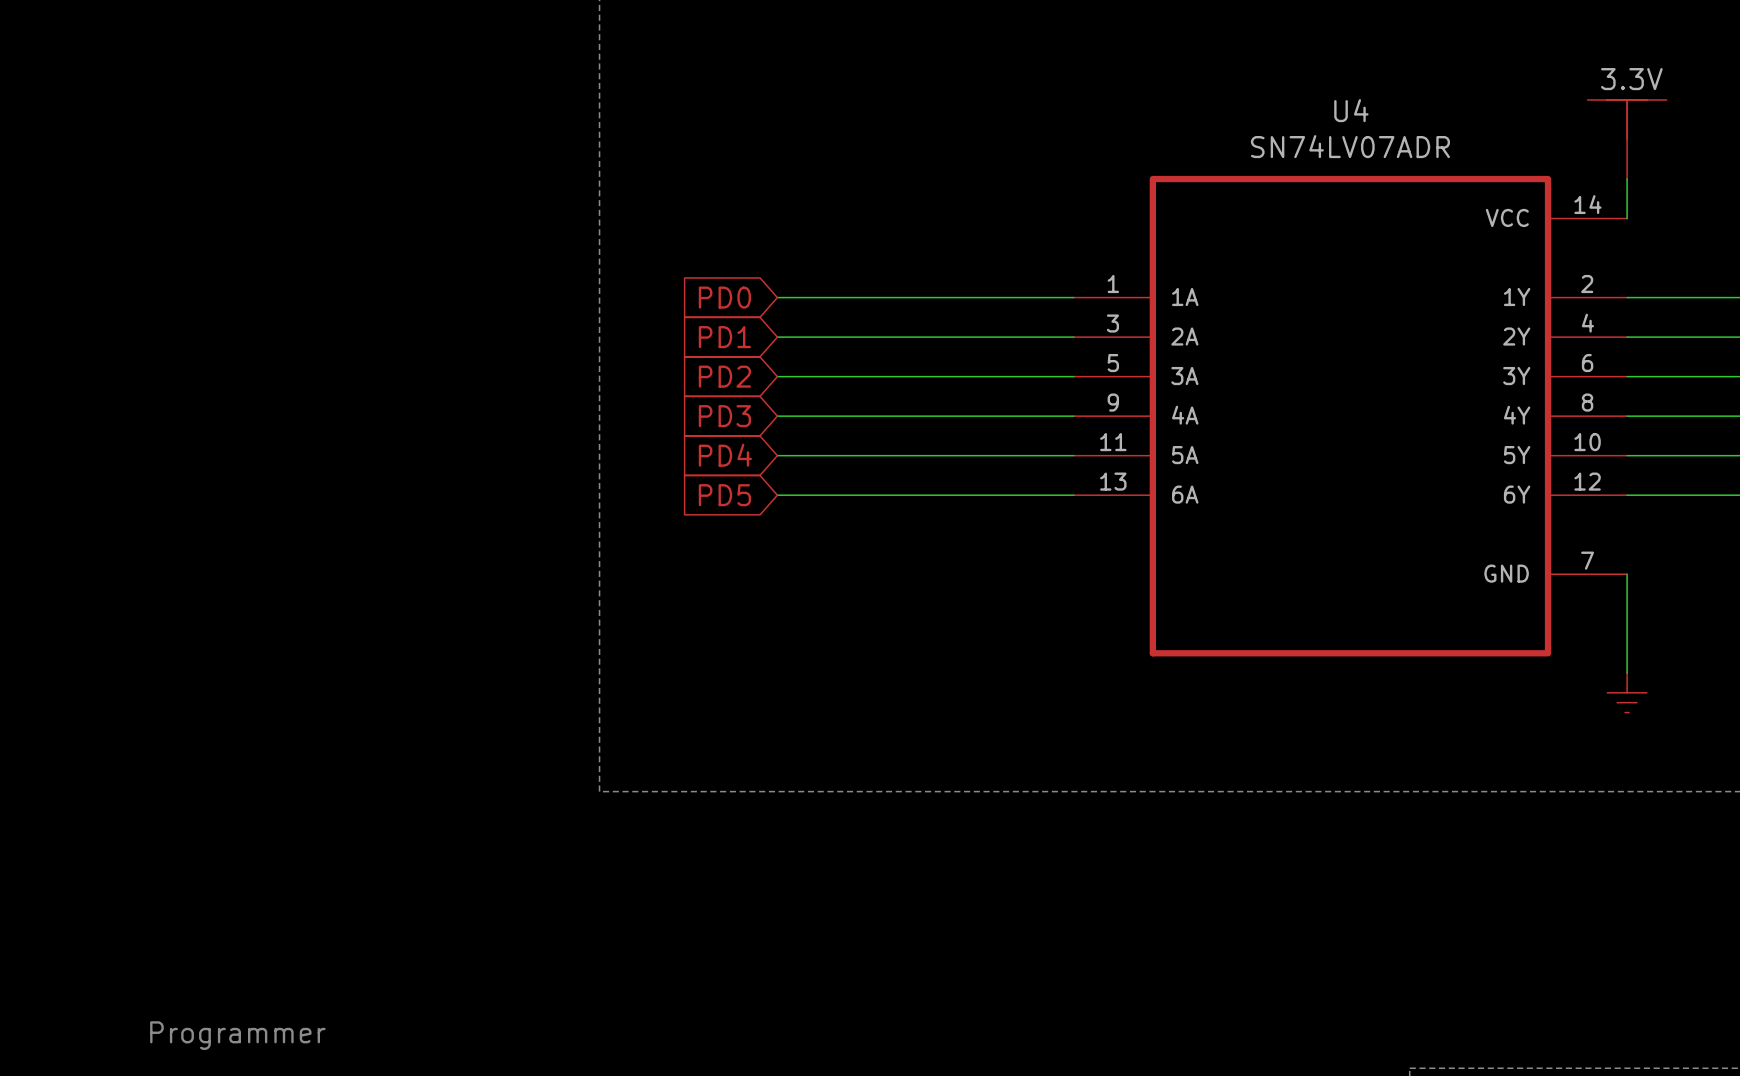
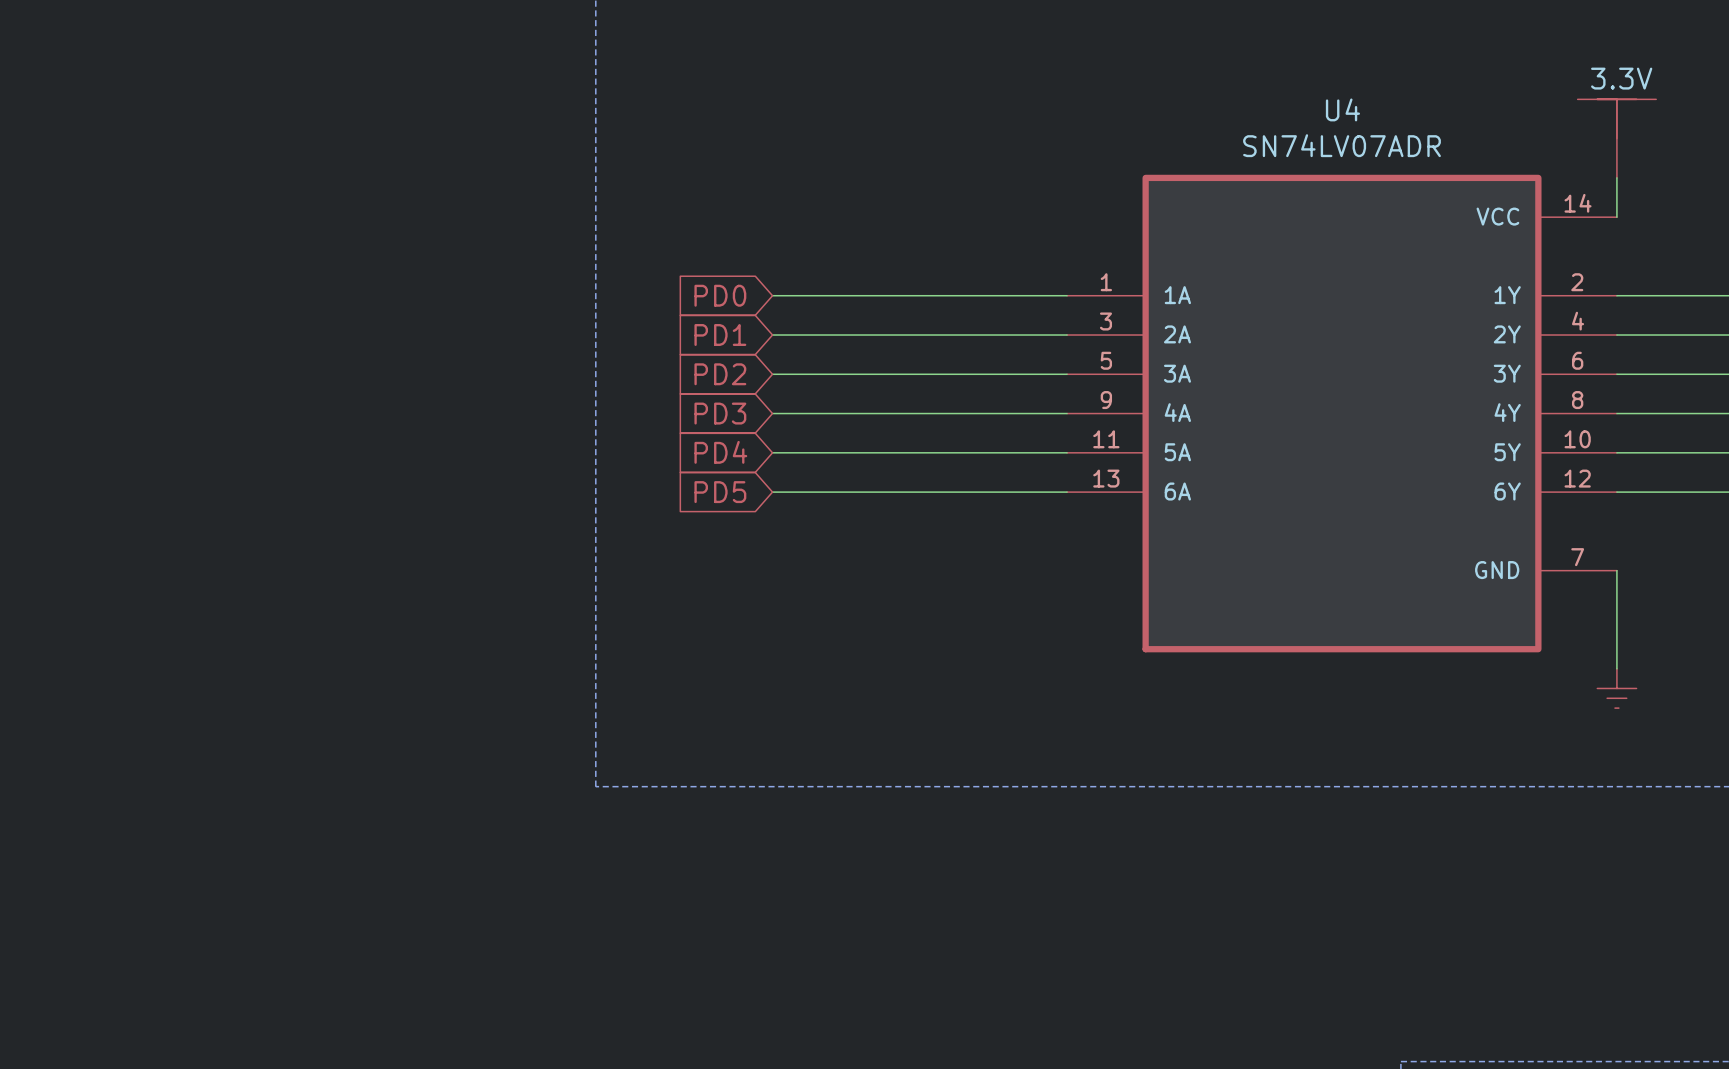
text: Programmer (237, 1035) -> none

